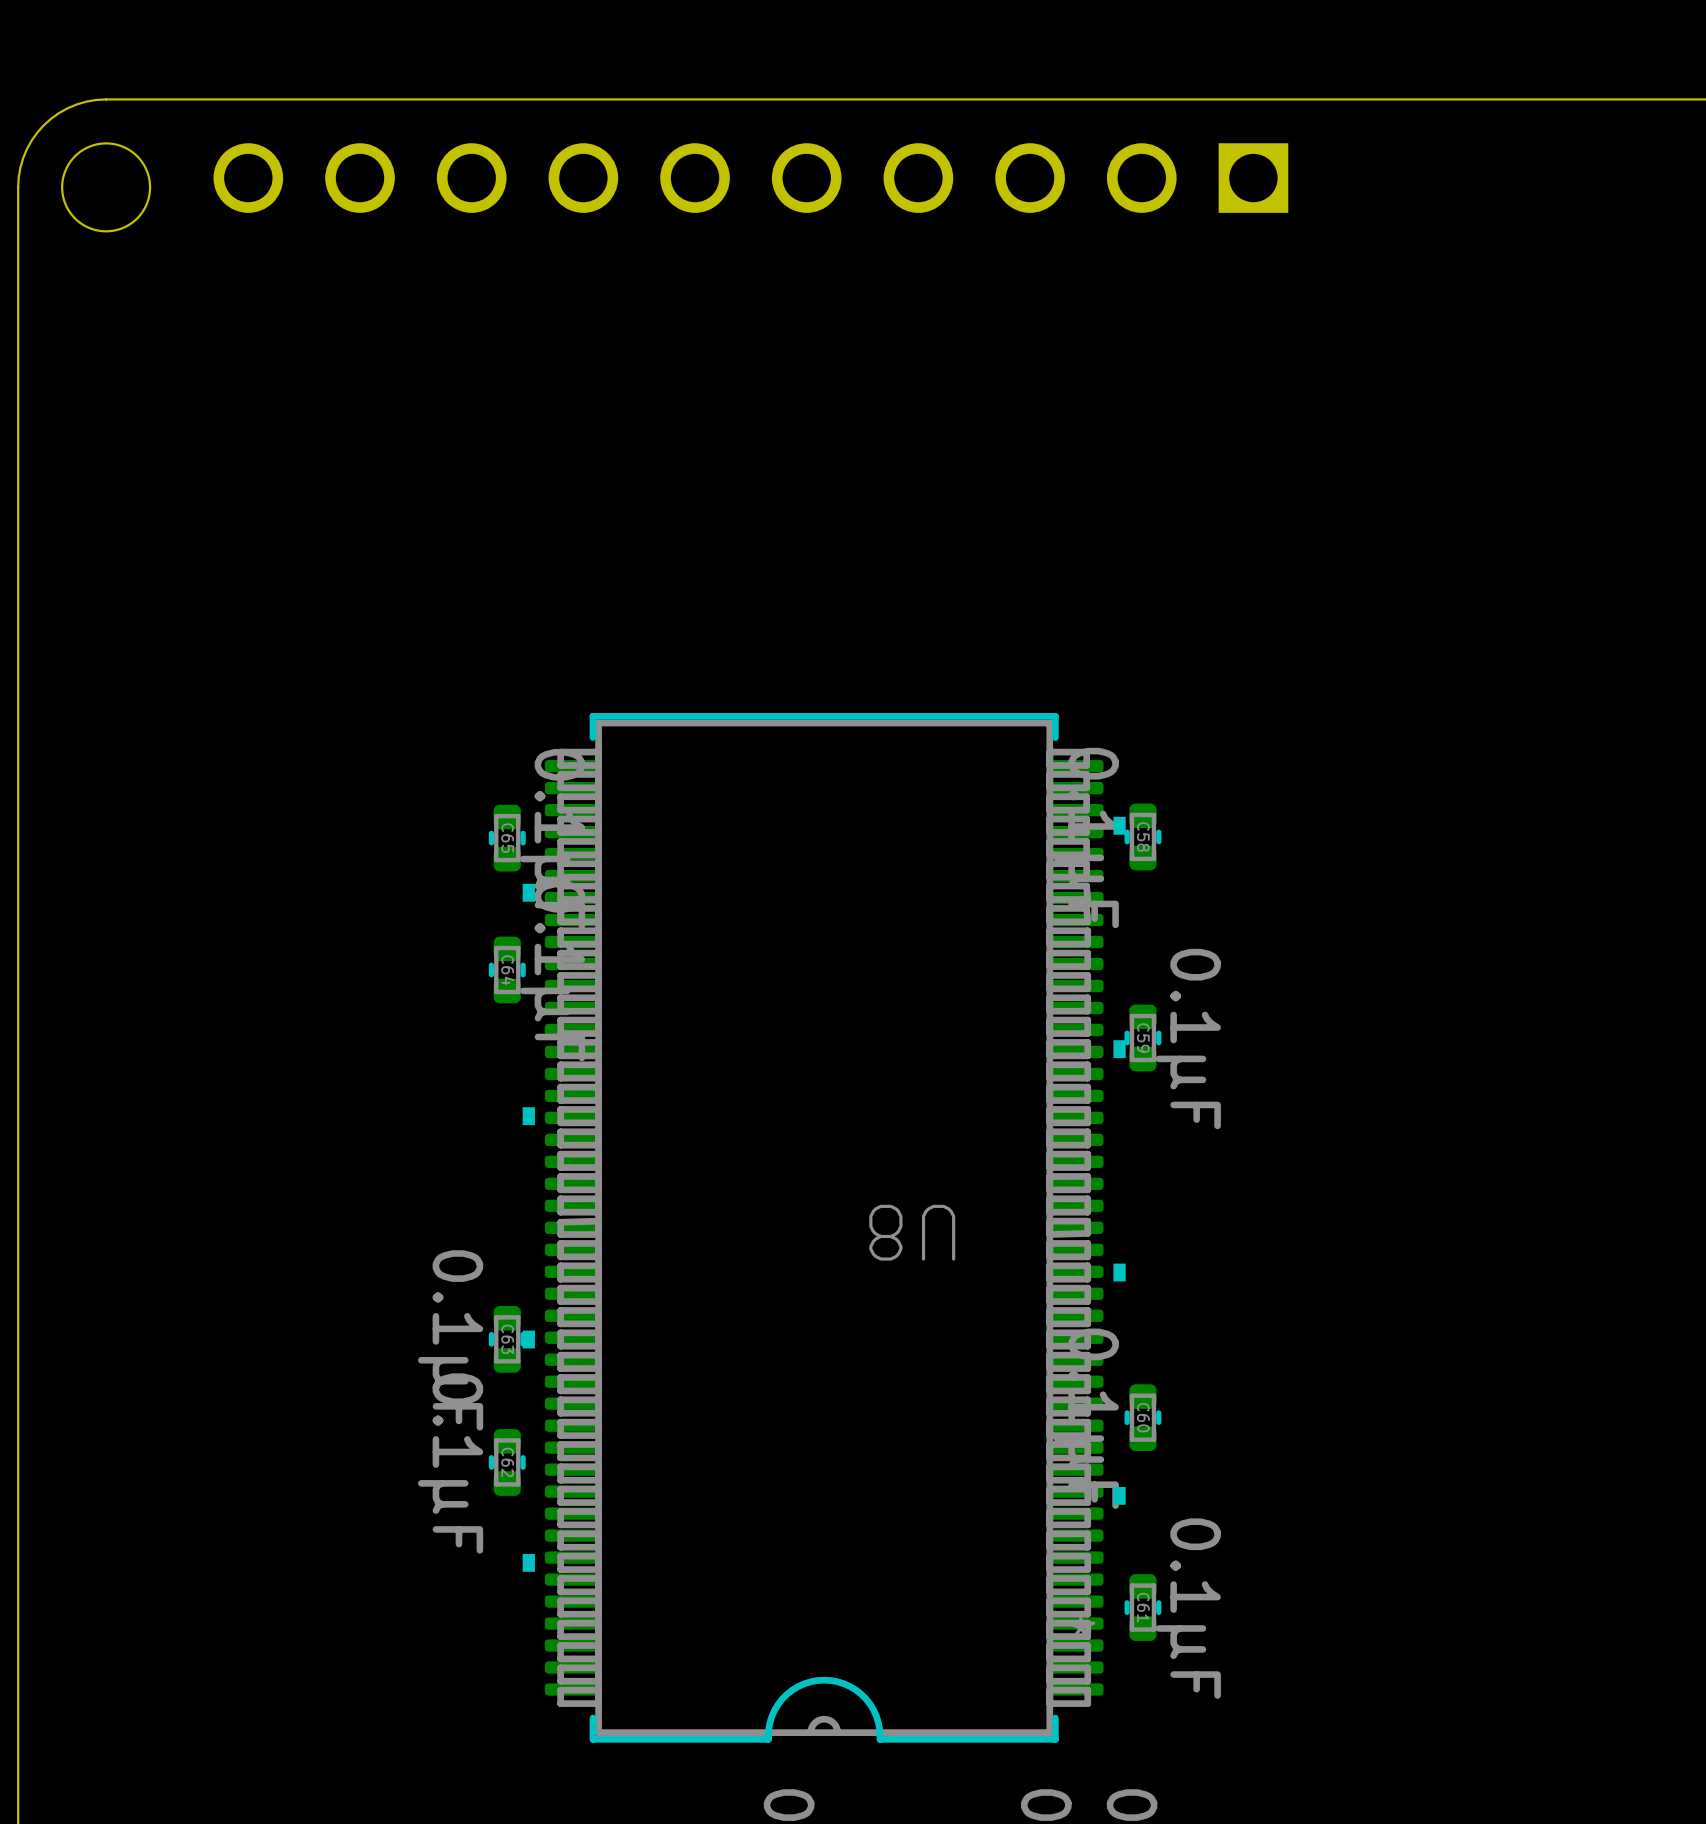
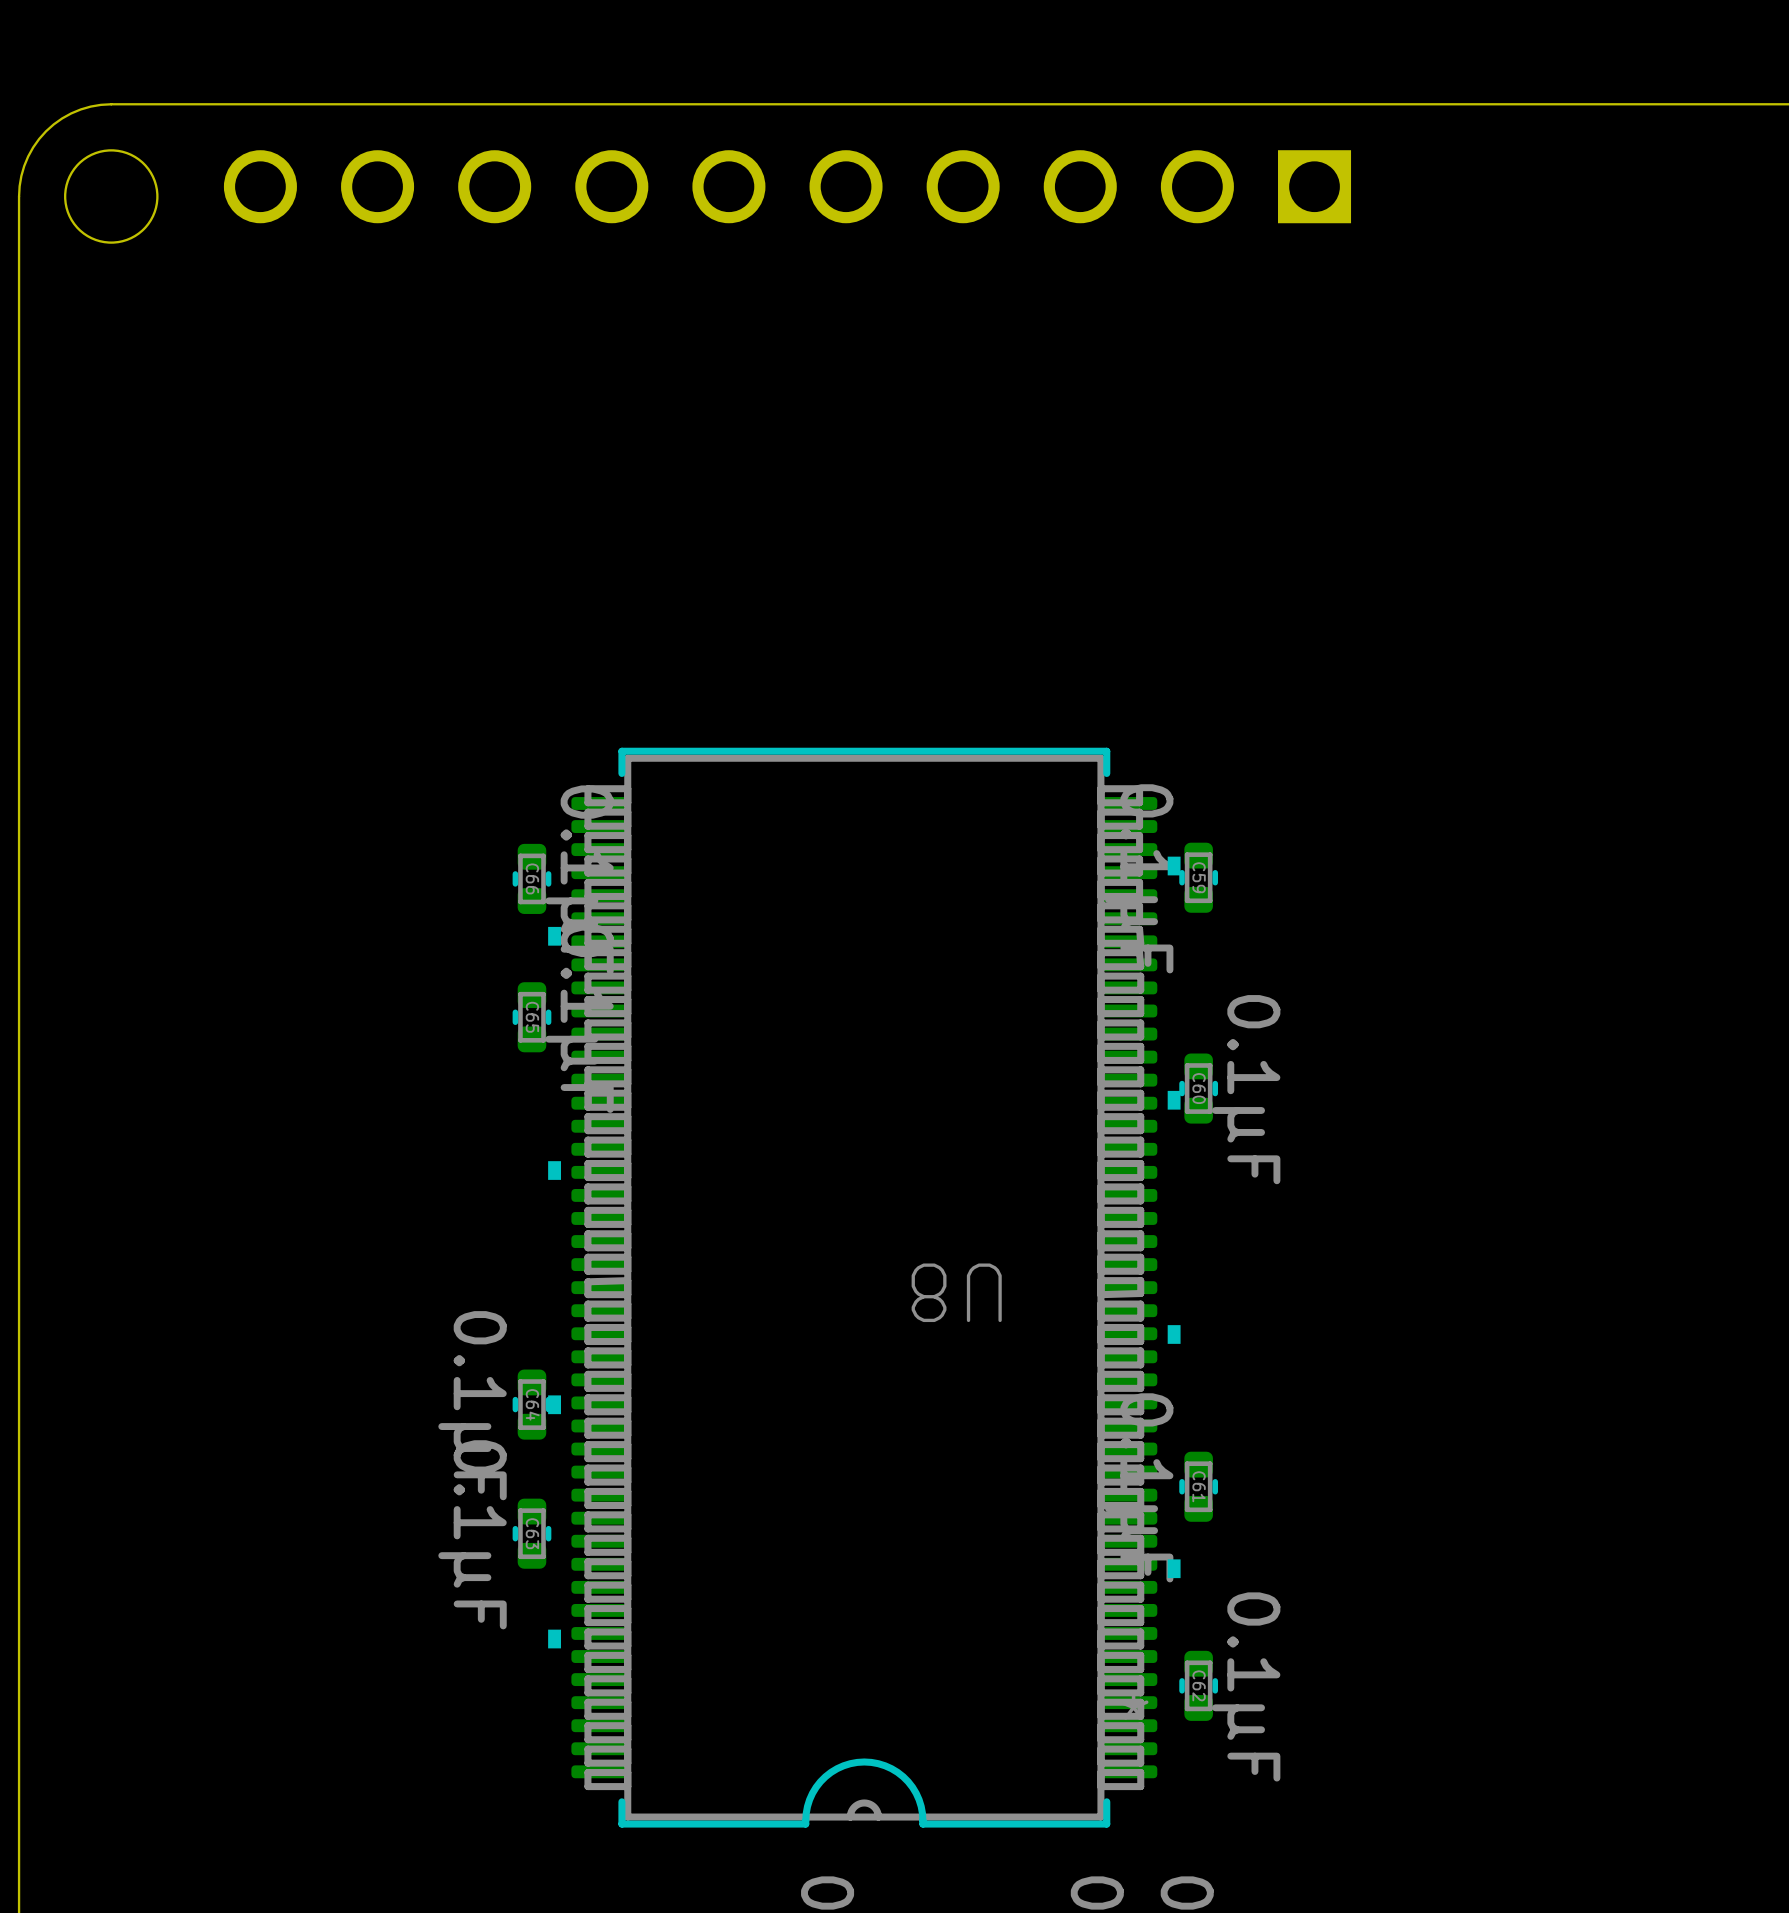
C58 name: C58 (1143, 836) -> C59 (1199, 877)
C65 name: C65 (507, 838) -> C66 (532, 878)
C64 name: C64 (507, 970) -> C65 (532, 1017)
C59 name: C59 (1143, 1037) -> C60 (1199, 1088)
C63 name: C63 (507, 1339) -> C64 (532, 1404)
C60 name: C60 (1143, 1417) -> C61 (1199, 1486)
C62 name: C62 (507, 1462) -> C63 (532, 1533)
C61 name: C61 (1143, 1607) -> C62 (1199, 1685)

